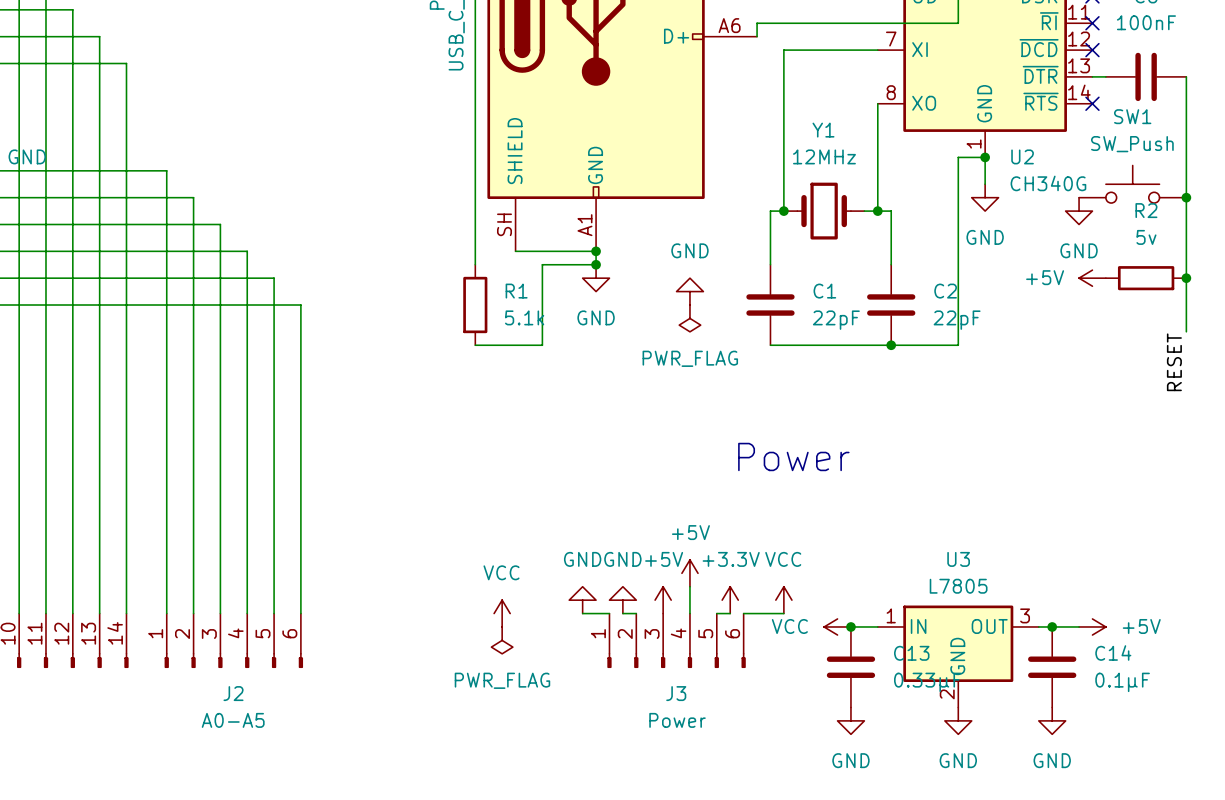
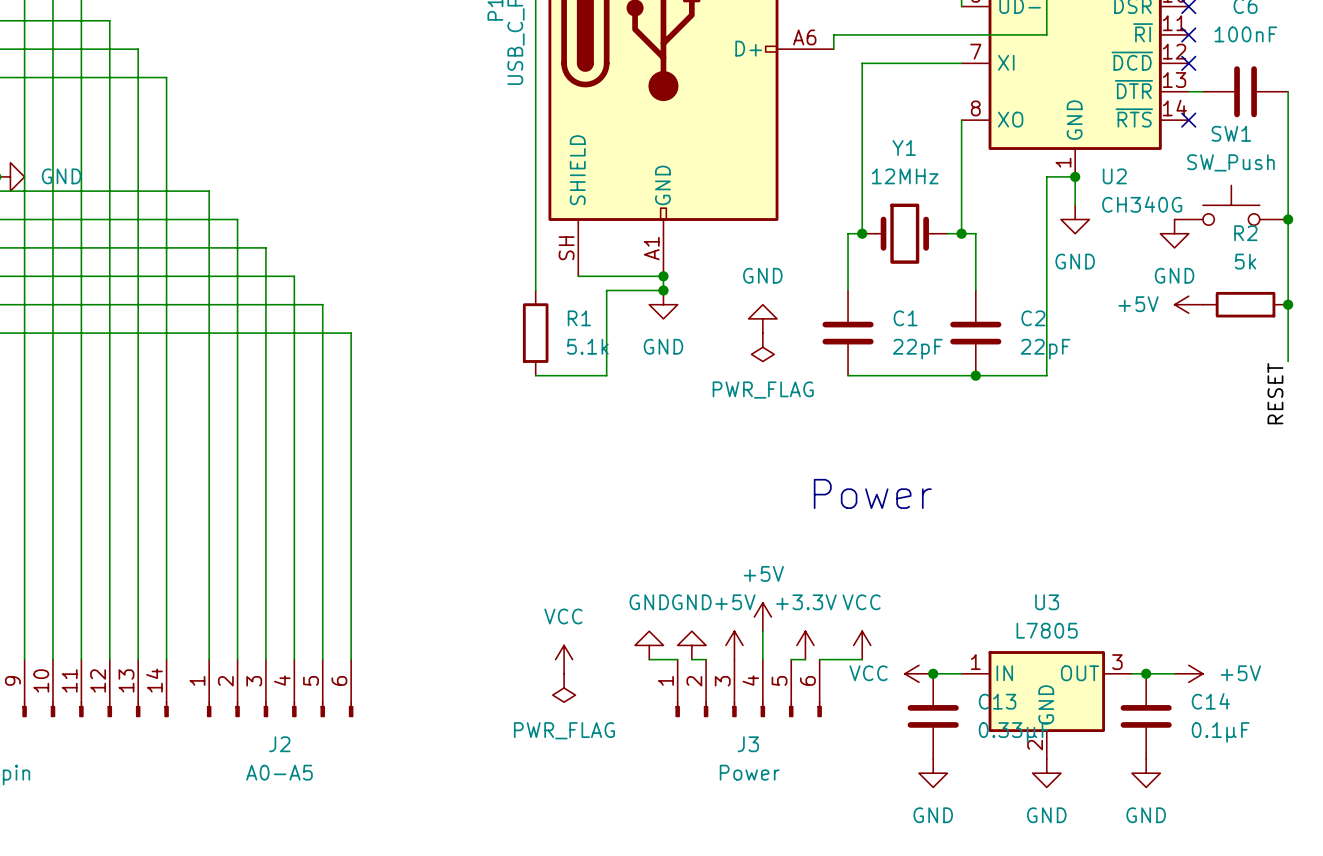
R2 value: 5v (1146, 237) -> 5k (1245, 261)

